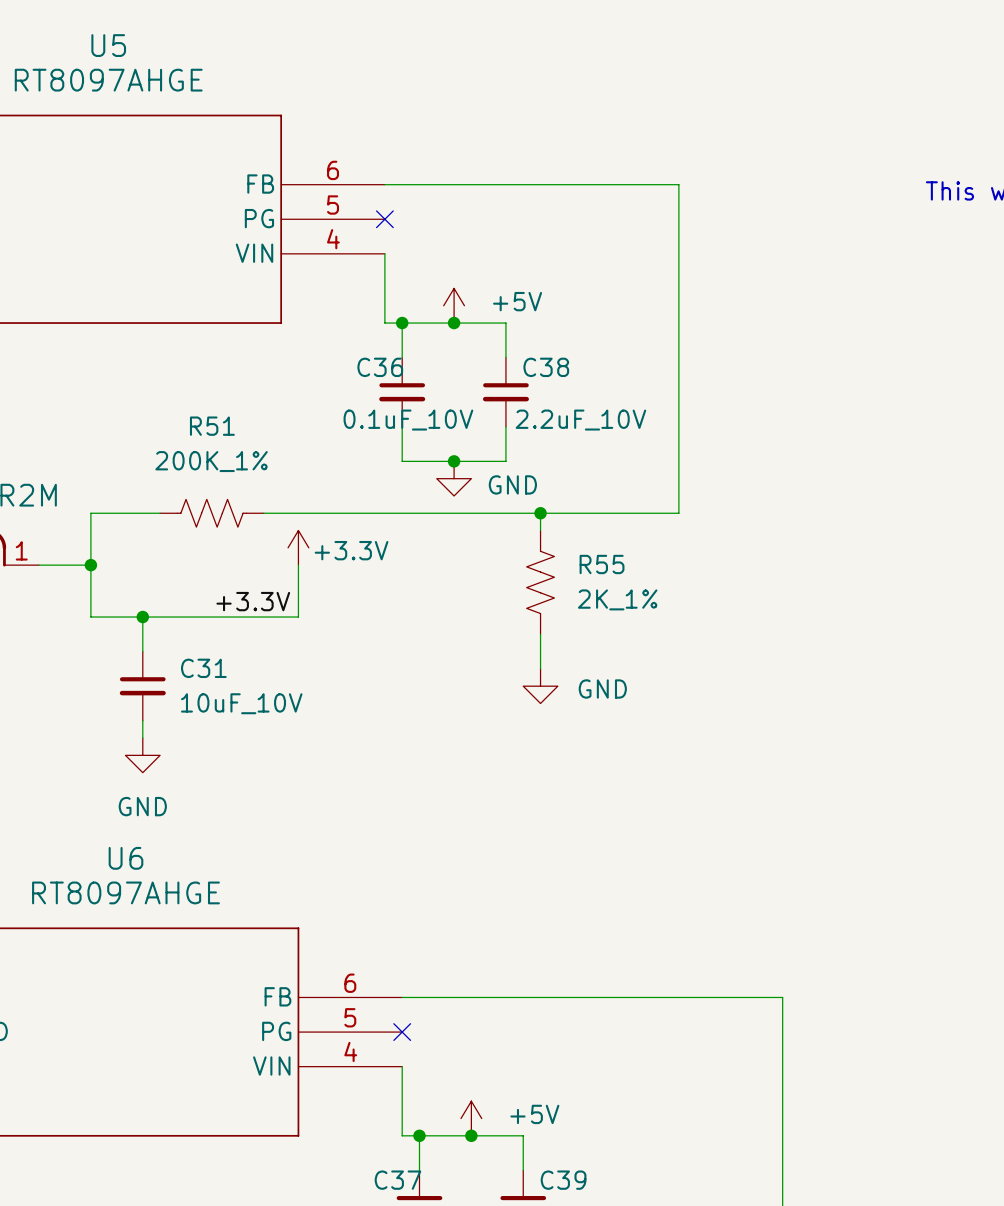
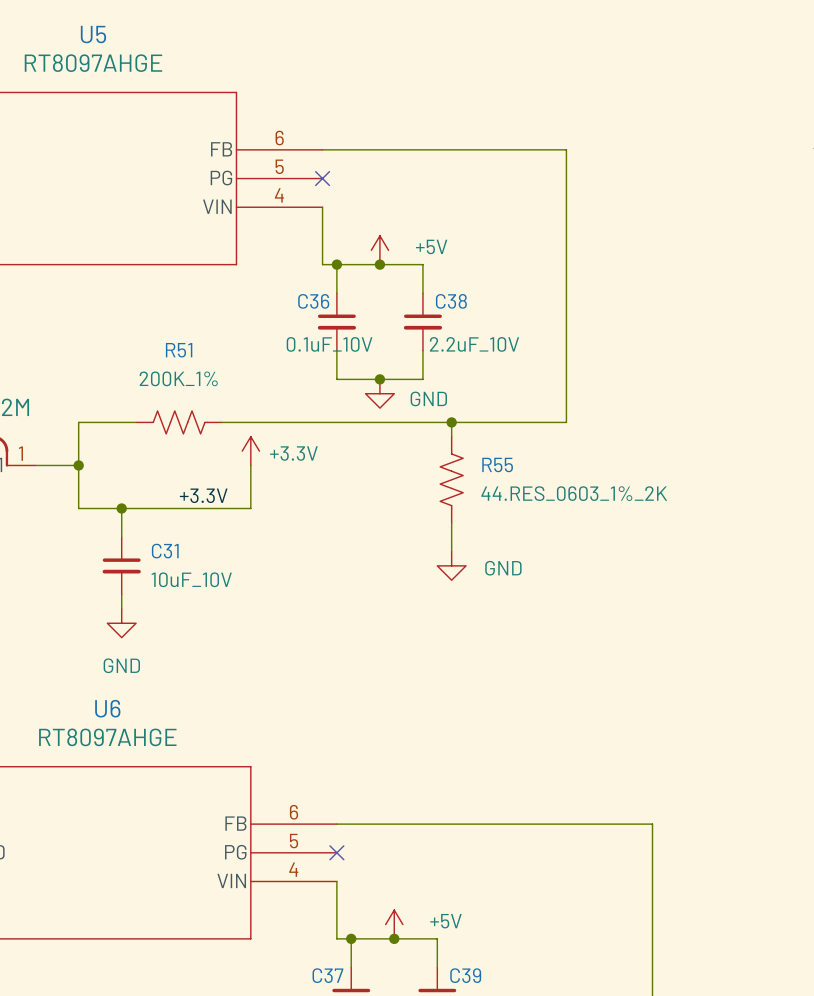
R55 value: 2K_1% (617, 599) -> 44.RES_0603_1%_2K (574, 493)

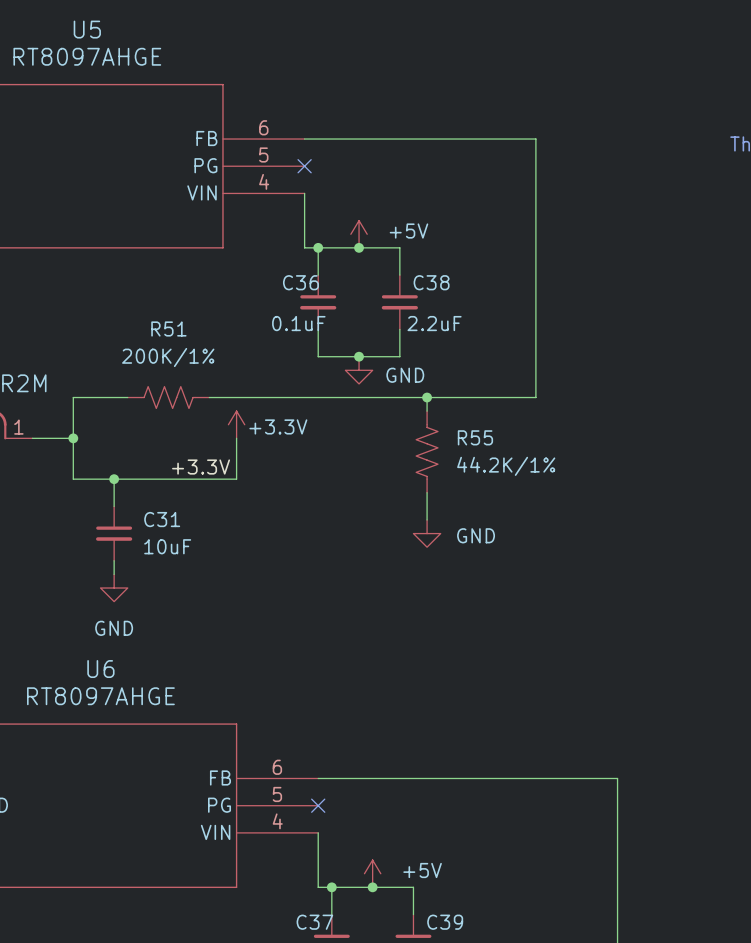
C36 value: 0.1uF_10V (329, 344) -> 0.1uF (298, 323)
C38 value: 2.2uF_10V (474, 344) -> 2.2uF (434, 323)
R51 value: 200K_1% (178, 378) -> 200K/1% (168, 357)
R55 value: 44.RES_0603_1%_2K (574, 493) -> 44.2K/1% (506, 466)
C31 value: 10uF_10V (191, 579) -> 10uF (167, 546)

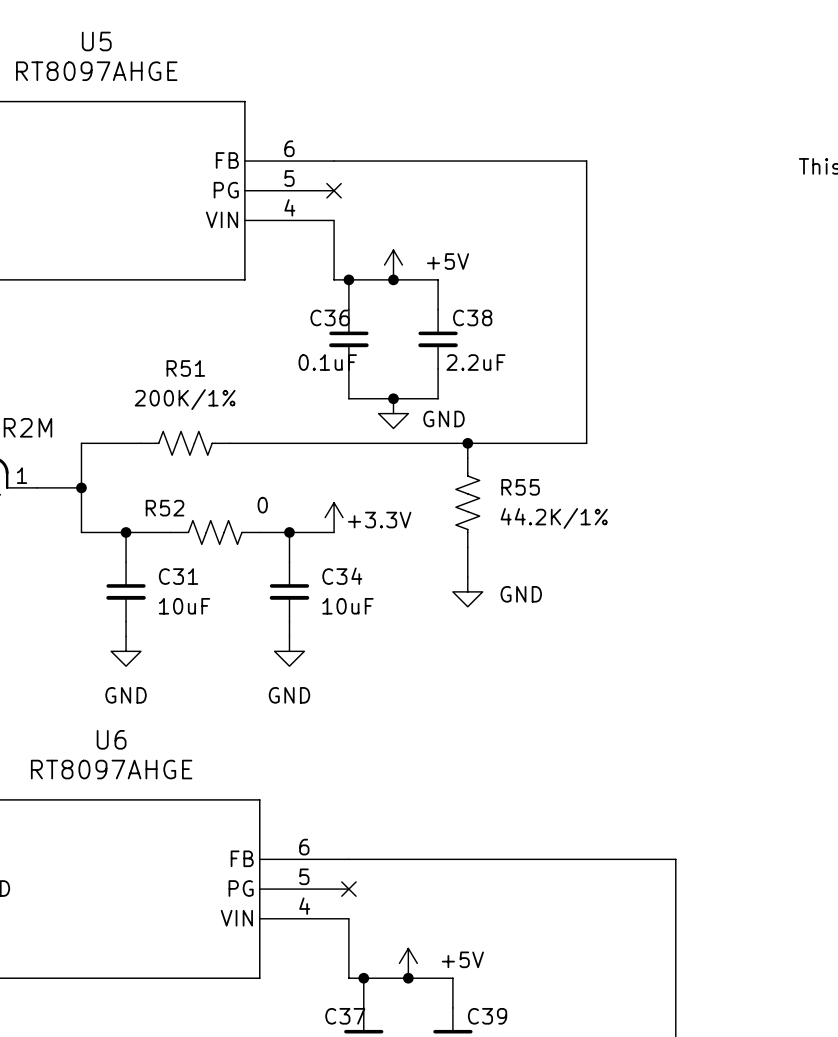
power symbol position: +3.3V (236, 424) -> +3.3V (334, 517)
wire: (236, 438) (236, 479) (154, 479) -> none
label: +3.3V (201, 467) -> none
R52: none -> 0 (215, 532)
wire: none -> (259, 532) (334, 532)
wire: none -> (289, 532) (289, 562)
junction: none -> (289, 532)
C34: none -> 10uF (289, 591)
wire: none -> (289, 621) (289, 636)
power symbol: none -> GND (289, 651)

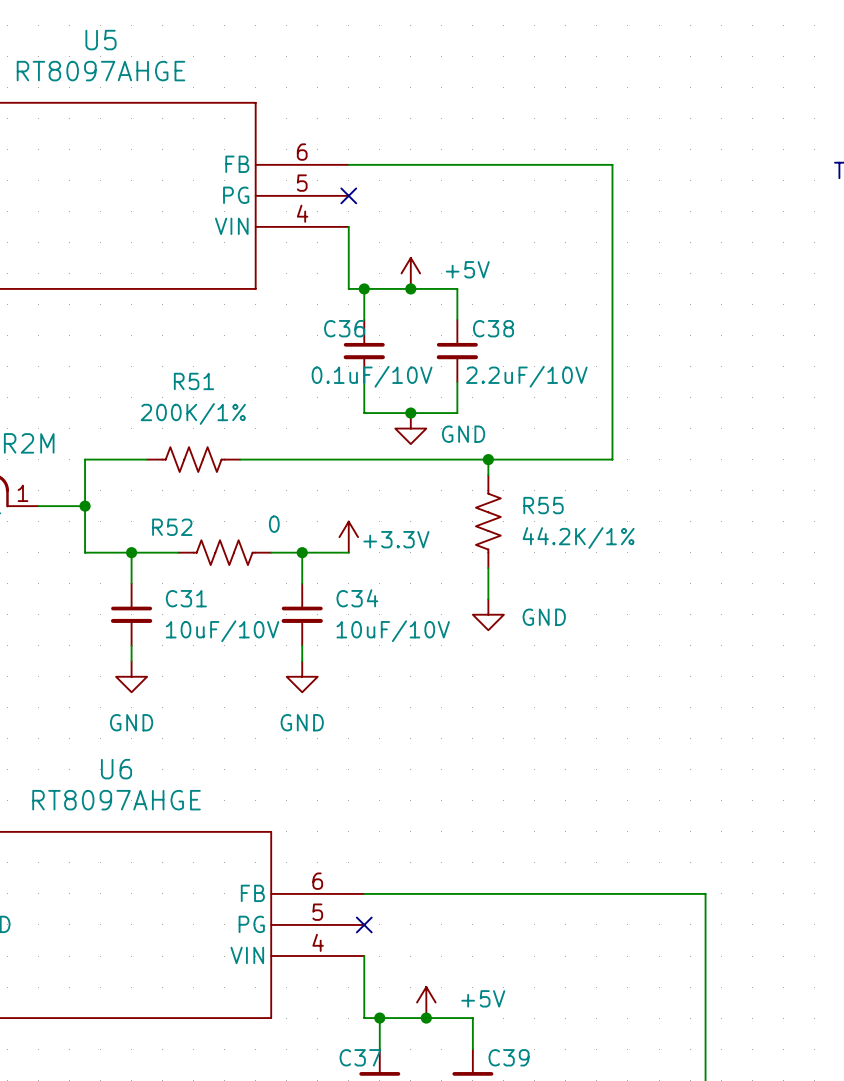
C36 value: 0.1uF (327, 362) -> 0.1uF/10V (372, 376)
C38 value: 2.2uF (475, 362) -> 2.2uF/10V (526, 376)
C31 value: 10uF (184, 606) -> 10uF/10V (222, 631)
C34 value: 10uF (347, 606) -> 10uF/10V (393, 631)

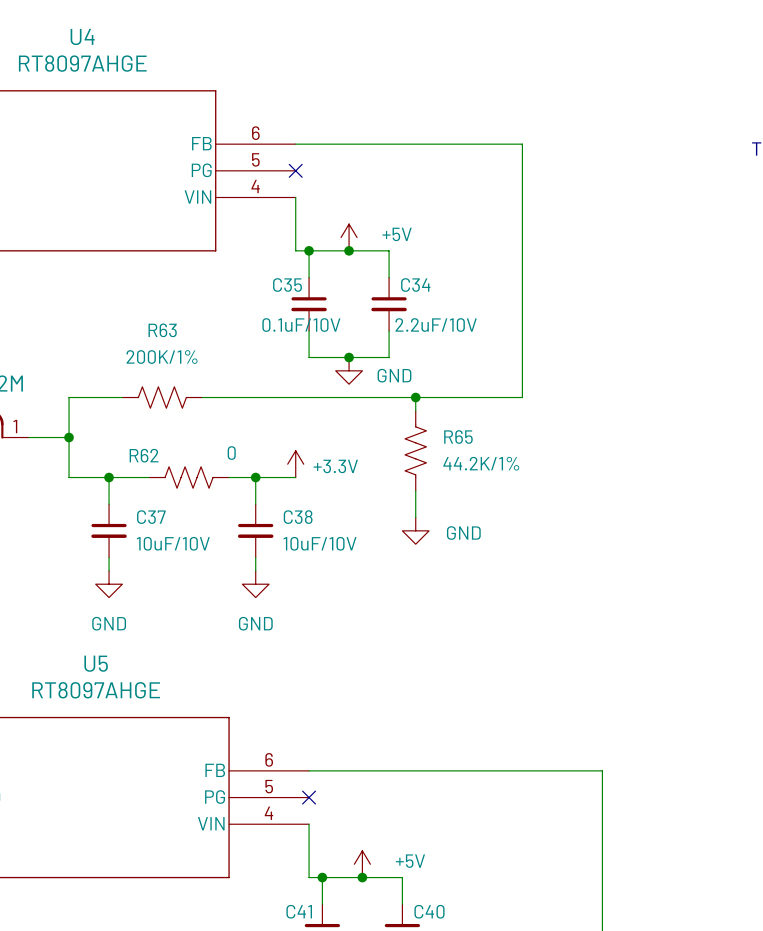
U5 name: U5 (101, 40) -> U4 (82, 36)
C36 name: C36 (344, 328) -> C35 (287, 285)
C38 name: C38 (493, 328) -> C34 (415, 285)
R51 name: R51 (194, 381) -> R63 (162, 330)
R55 name: R55 (543, 505) -> R65 (458, 437)
R52 name: R52 (172, 527) -> R62 (144, 455)
C31 name: C31 (186, 598) -> C37 (151, 517)
C34 name: C34 (357, 598) -> C38 (298, 517)
U6 name: U6 (116, 769) -> U5 (96, 663)
C37 name: C37 (360, 1057) -> C41 (299, 911)
C39 name: C39 (509, 1057) -> C40 (429, 911)

